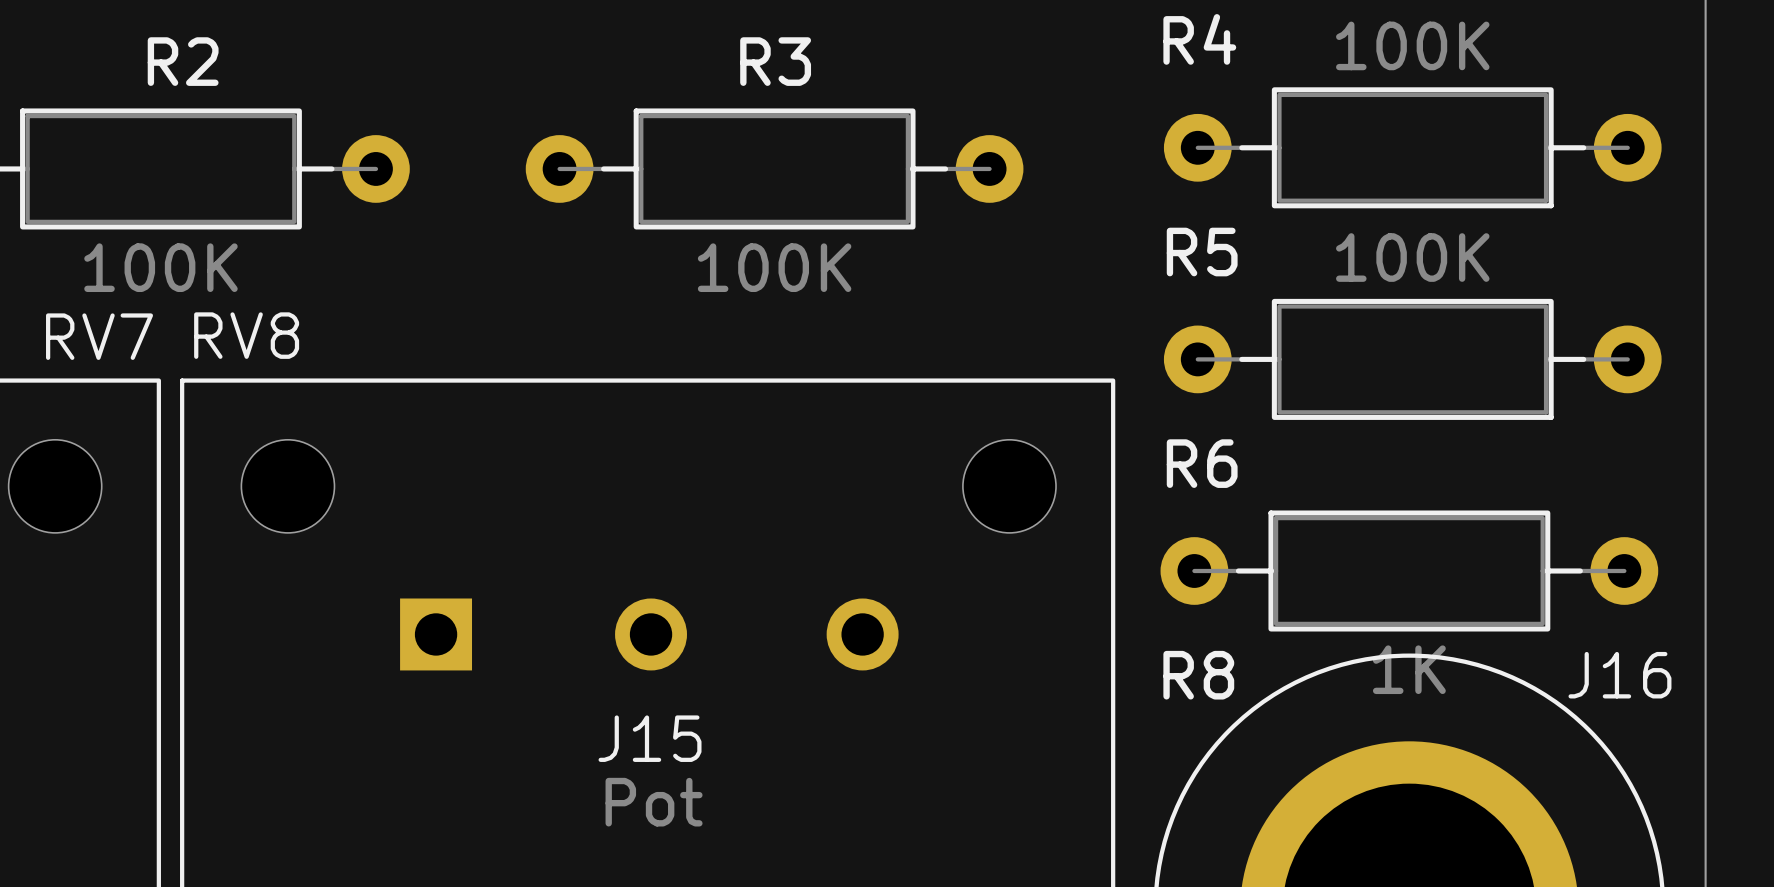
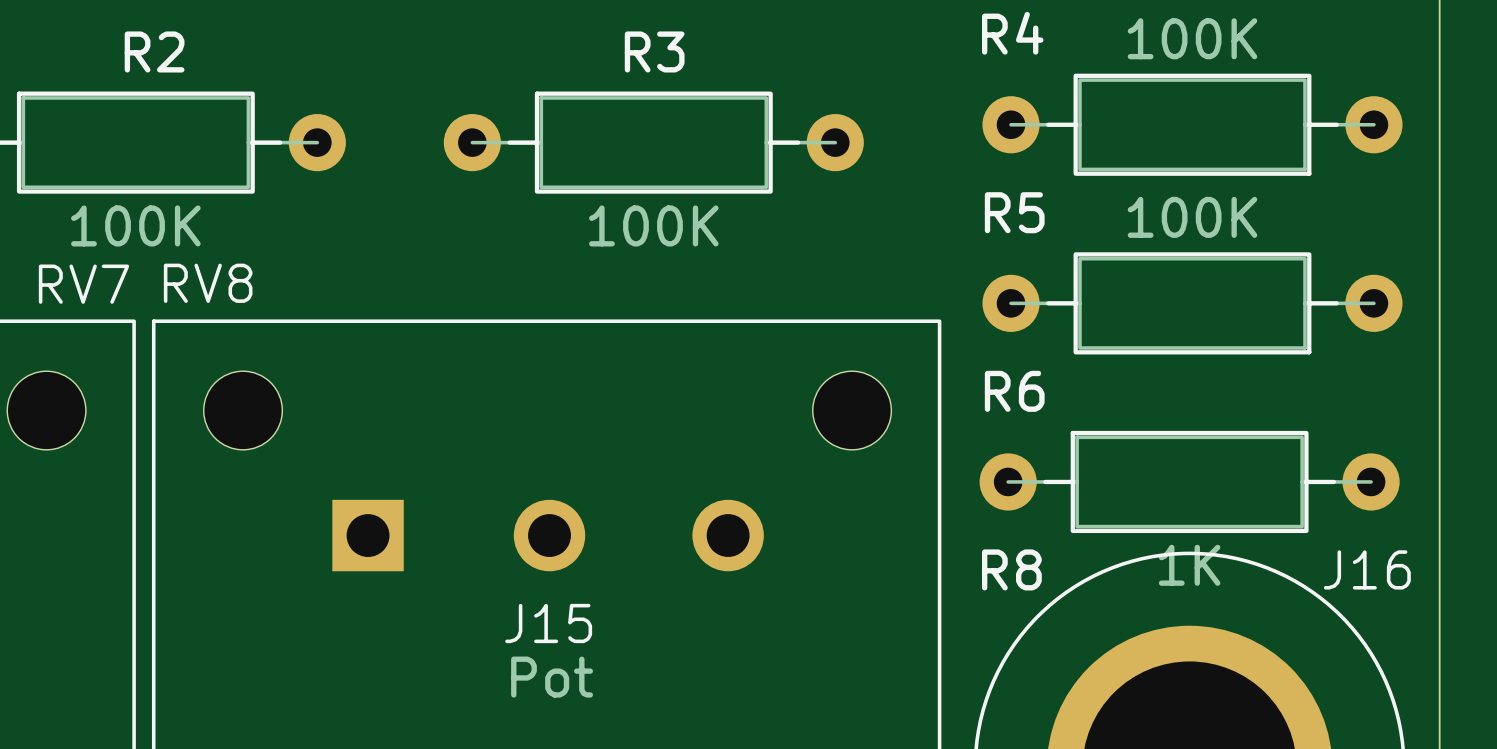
J15 footprint: [400, 598, 899, 671] -> [332, 499, 764, 572]

